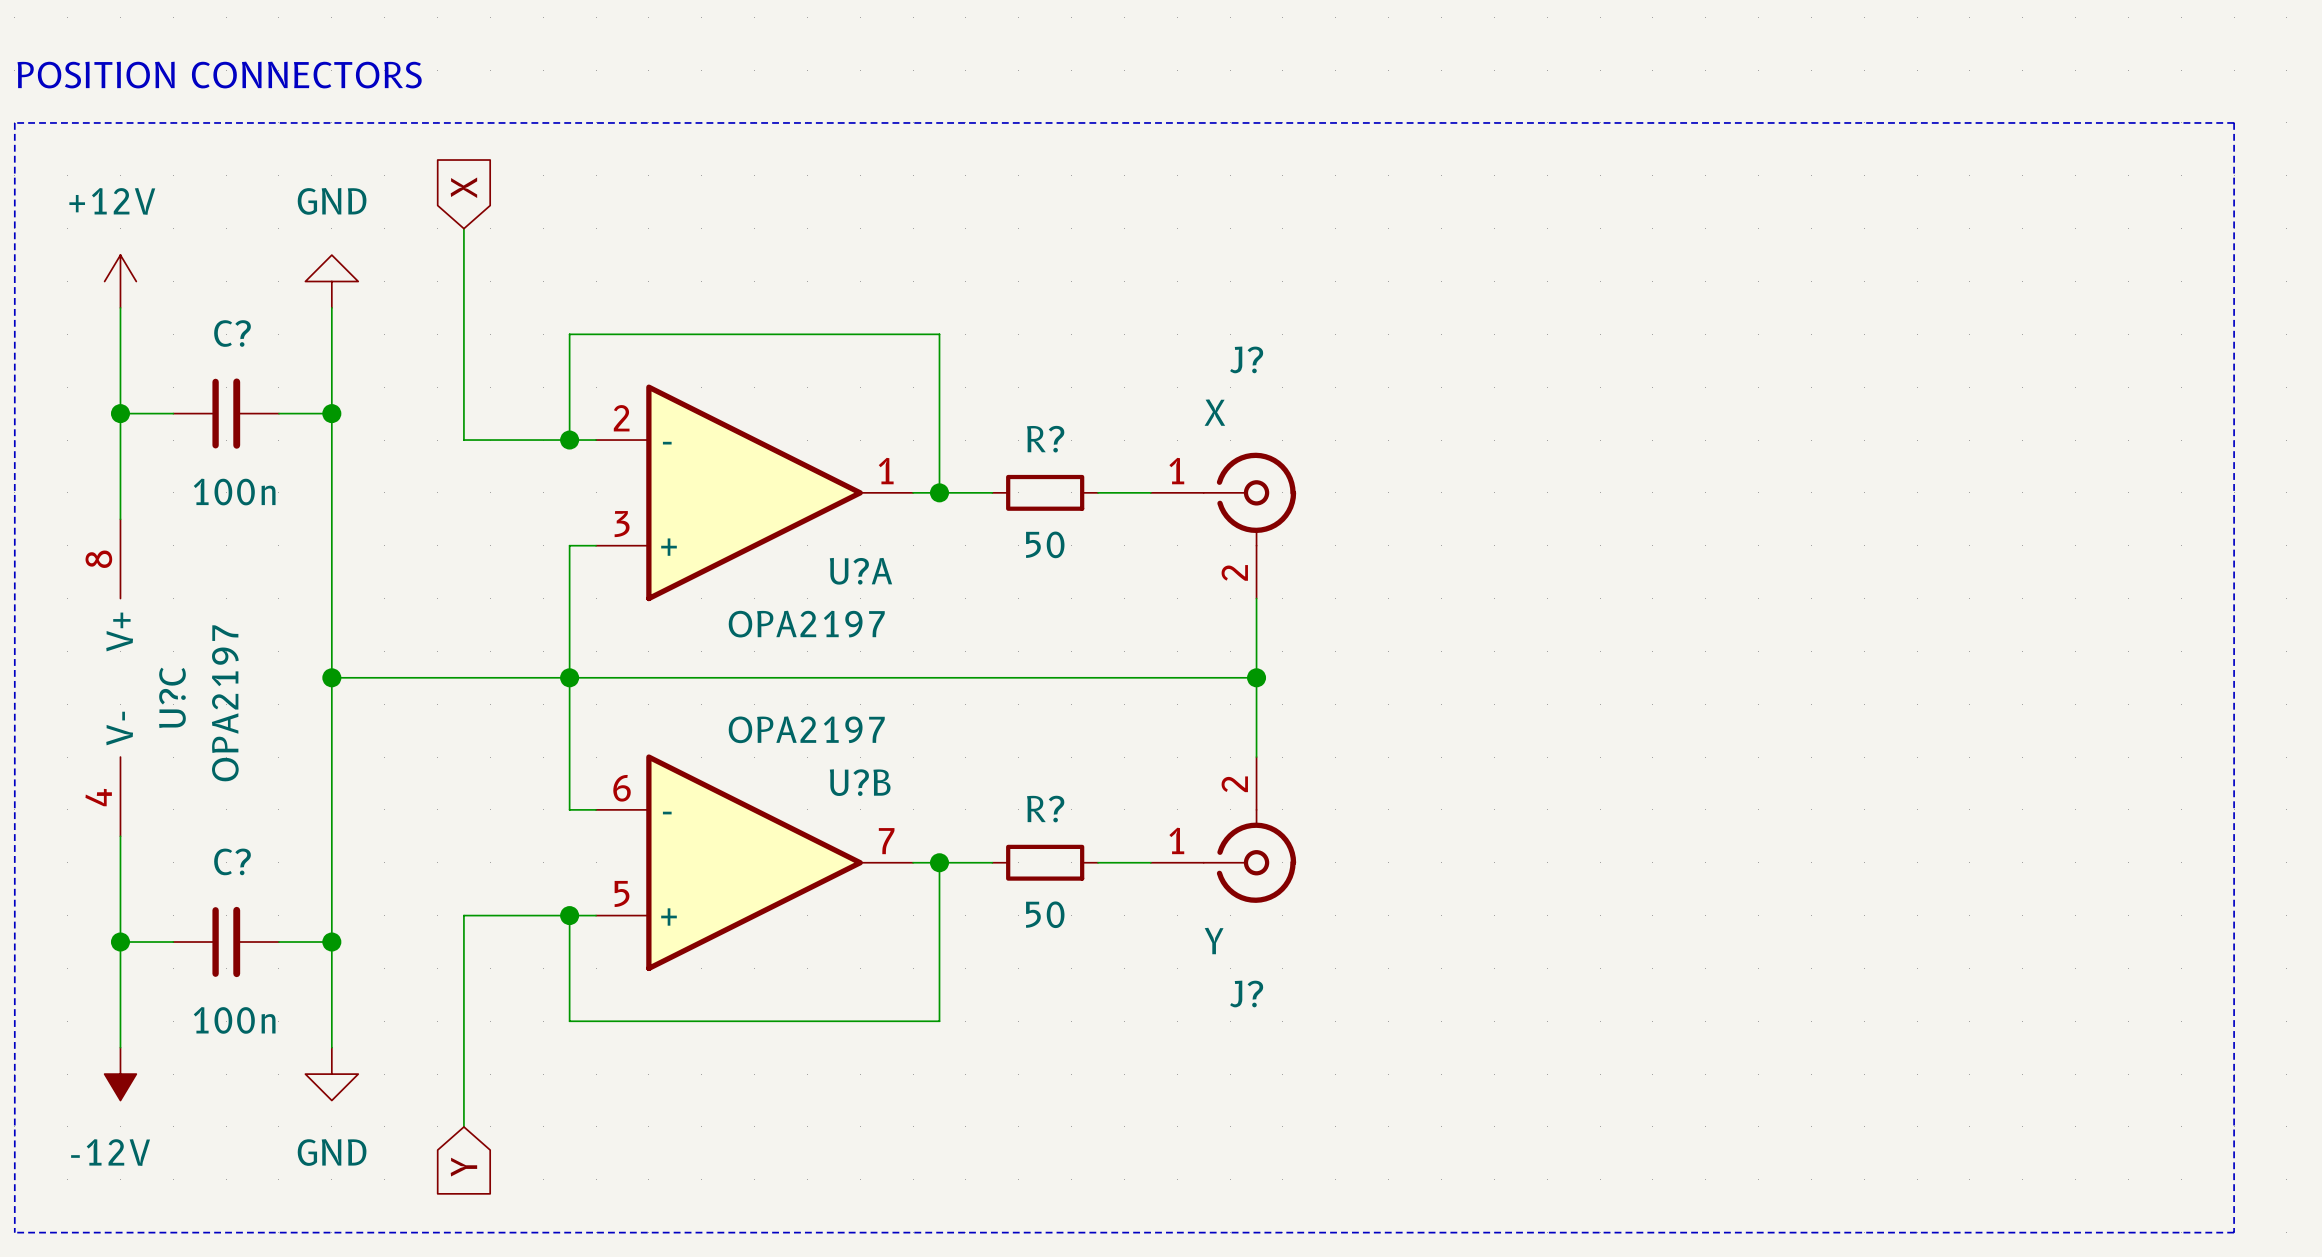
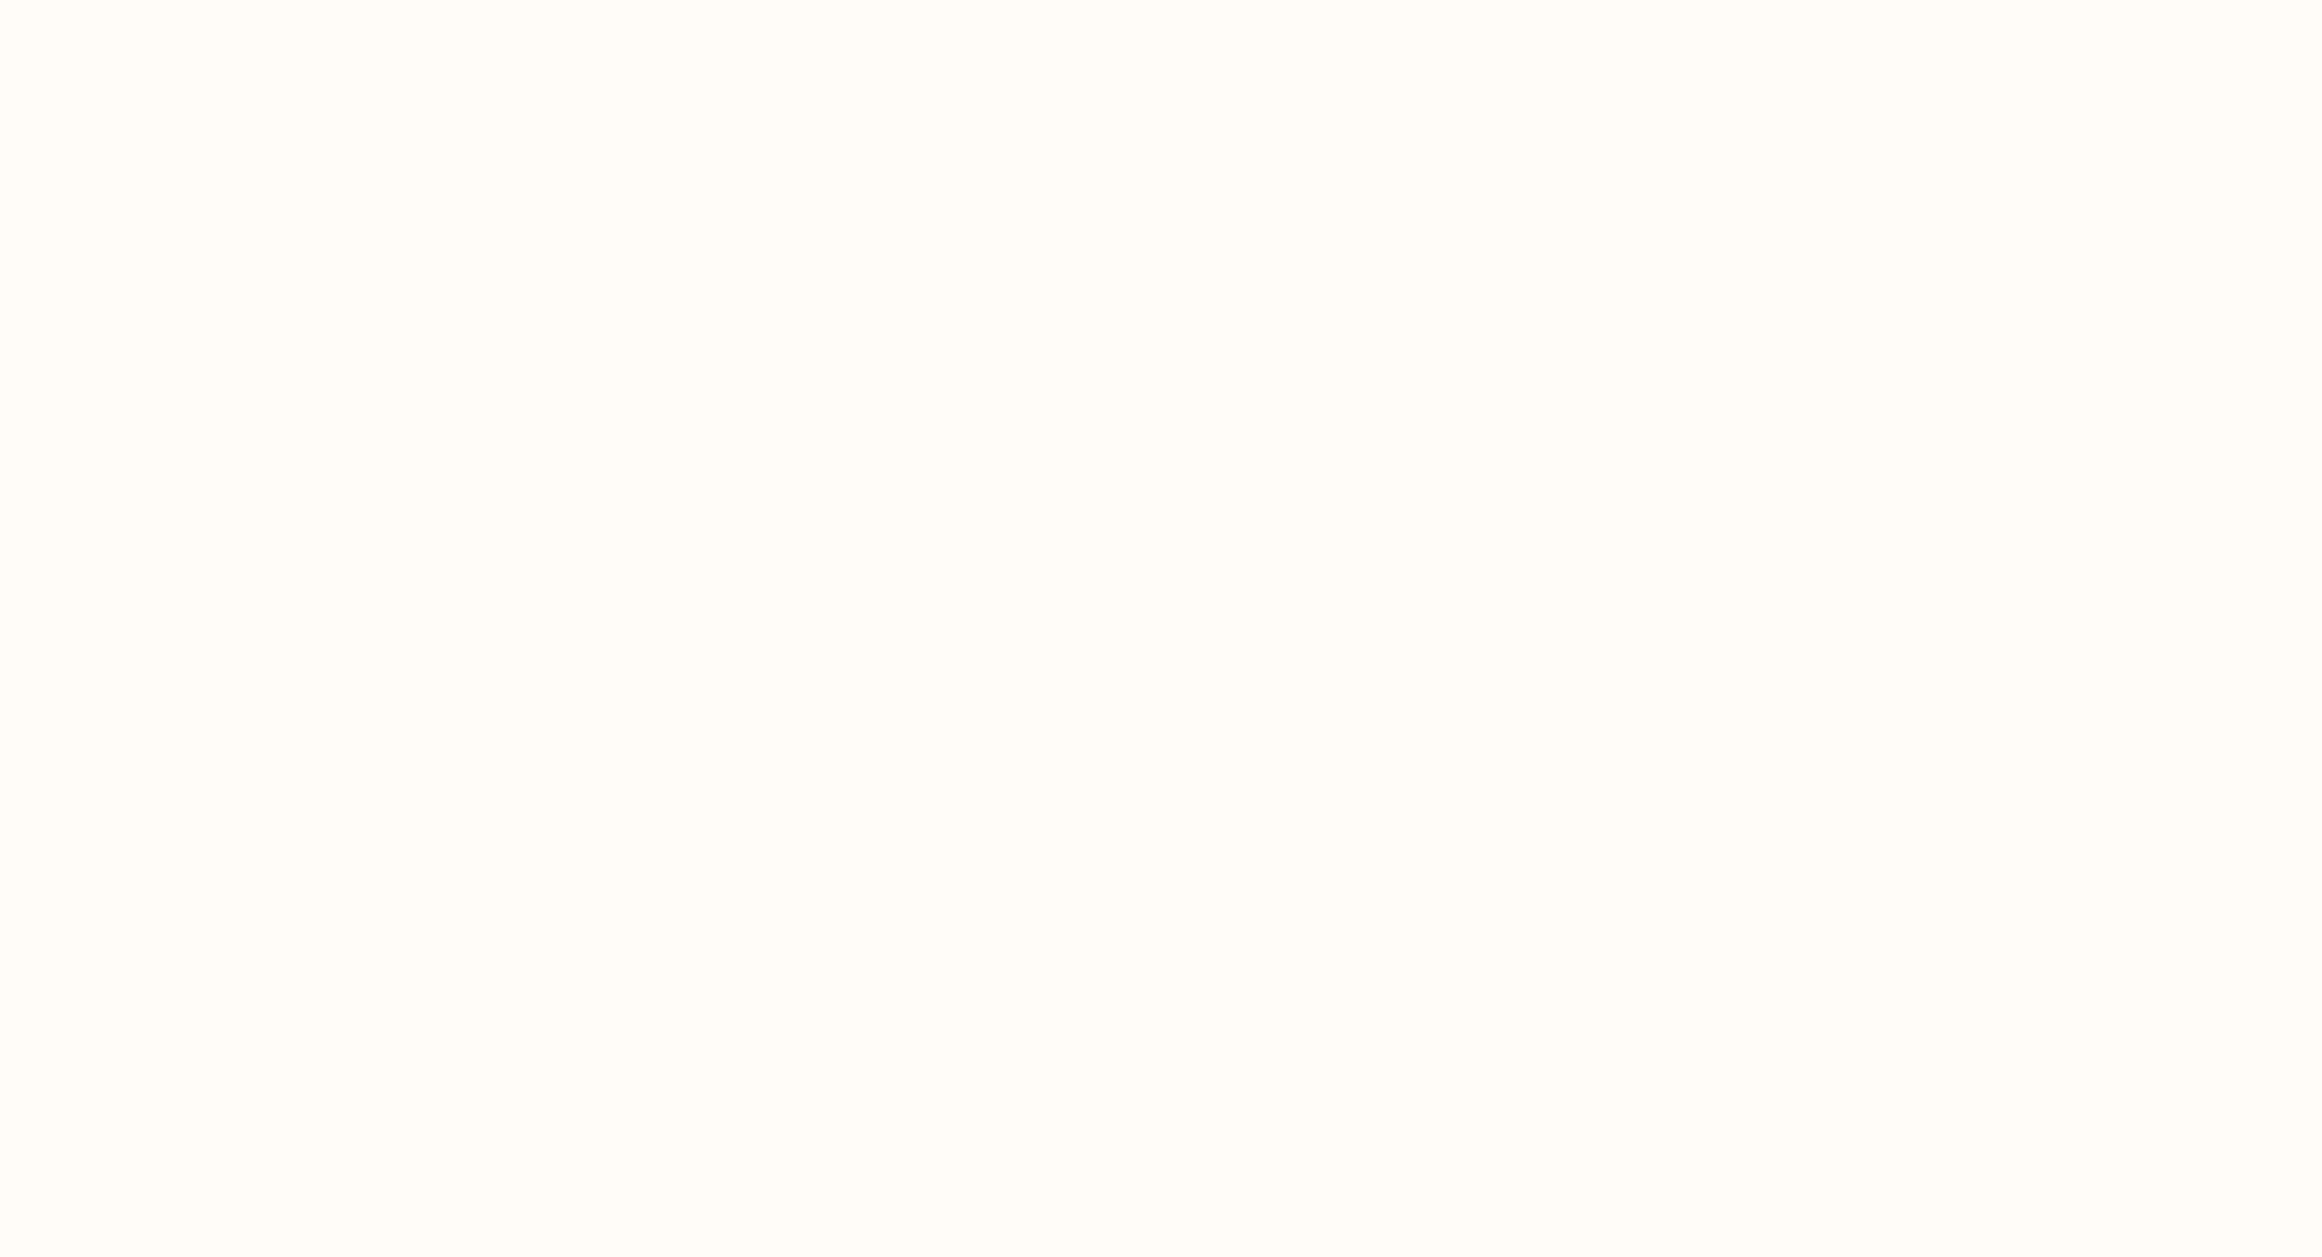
text: POSITION CONNECTORS (219, 75) -> none
line: (14, 122) (2234, 122) (2234, 1232) (14, 1232) (14, 122) -> none
global label: X (463, 187) -> none
wire: (463, 228) (463, 440) (596, 440) -> none
power symbol: +12V (120, 281) -> none
power symbol: GND (331, 281) -> none
wire: (120, 307) (120, 519) -> none
wire: (331, 307) (331, 1047) -> none
wire: (120, 413) (173, 413) -> none
junction: (120, 413) -> none
C?: 100n (226, 413) -> none
wire: (278, 413) (331, 413) -> none
junction: (331, 413) -> none
wire: (569, 440) (569, 334) (939, 334) (939, 492) -> none
junction: (569, 440) -> none
U?A: OPA2197 (754, 492) -> none
wire: (913, 492) (992, 492) -> none
junction: (939, 492) -> none
R?: 50 (1045, 492) -> none
wire: (1098, 492) (1150, 492) -> none
J?: X (1223, 525) -> none
wire: (596, 545) (569, 545) (569, 809) (596, 809) -> none
wire: (1256, 598) (1256, 757) -> none
U?C: OPA2197 (120, 677) -> none
wire: (331, 677) (1256, 677) -> none
junction: (331, 677) -> none
junction: (569, 677) -> none
junction: (1256, 677) -> none
J?: Y (1223, 829) -> none
wire: (120, 836) (120, 1047) -> none
U?B: OPA2197 (754, 862) -> none
wire: (913, 862) (992, 862) -> none
wire: (939, 862) (939, 1021) (569, 1021) (569, 915) -> none
junction: (939, 862) -> none
R?: 50 (1045, 862) -> none
wire: (1098, 862) (1150, 862) -> none
junction: (569, 915) -> none
wire: (596, 915) (463, 915) (463, 1126) -> none
wire: (120, 942) (173, 942) -> none
junction: (120, 942) -> none
C?: 100n (226, 942) -> none
wire: (278, 942) (331, 942) -> none
junction: (331, 942) -> none
power symbol: -12V (120, 1074) -> none
power symbol: GND (331, 1074) -> none
global label: Y (463, 1167) -> none

